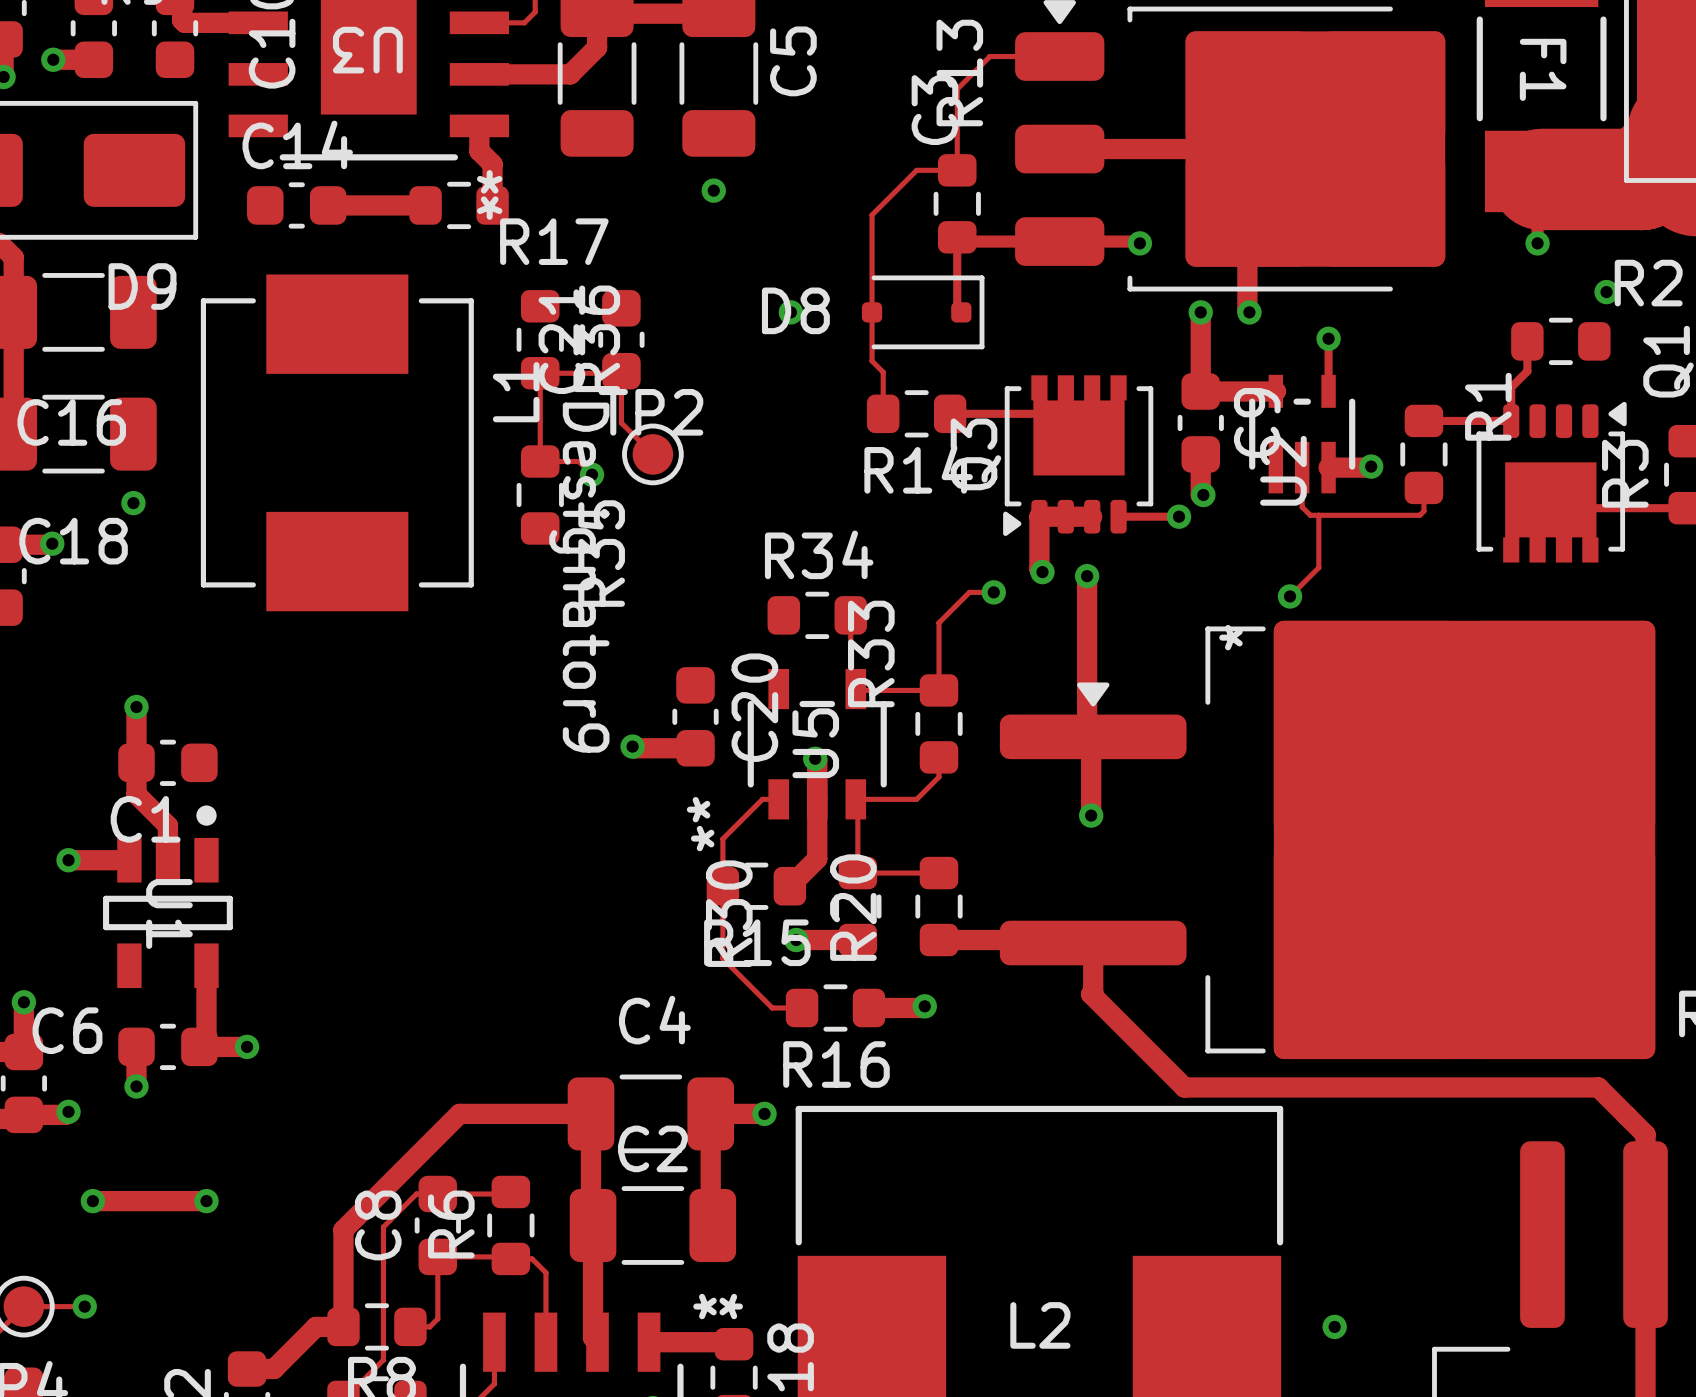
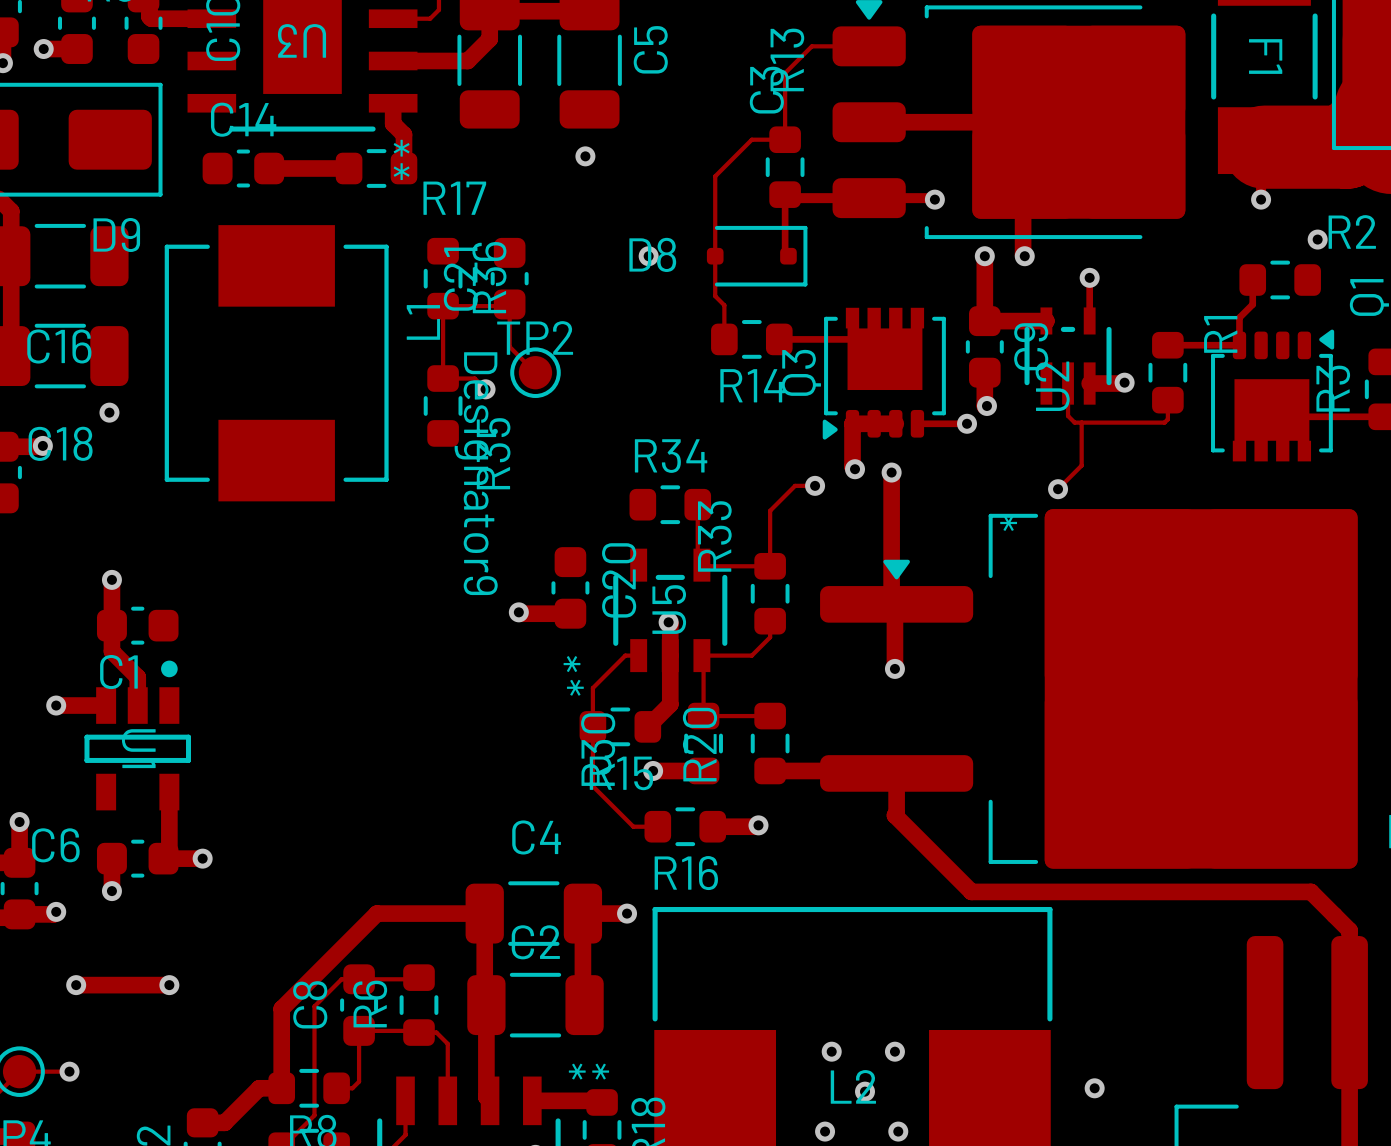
via: none -> (831, 1051)
via: none -> (894, 1051)
via: none -> (865, 1091)
via: none -> (825, 1131)
via: none -> (898, 1131)

